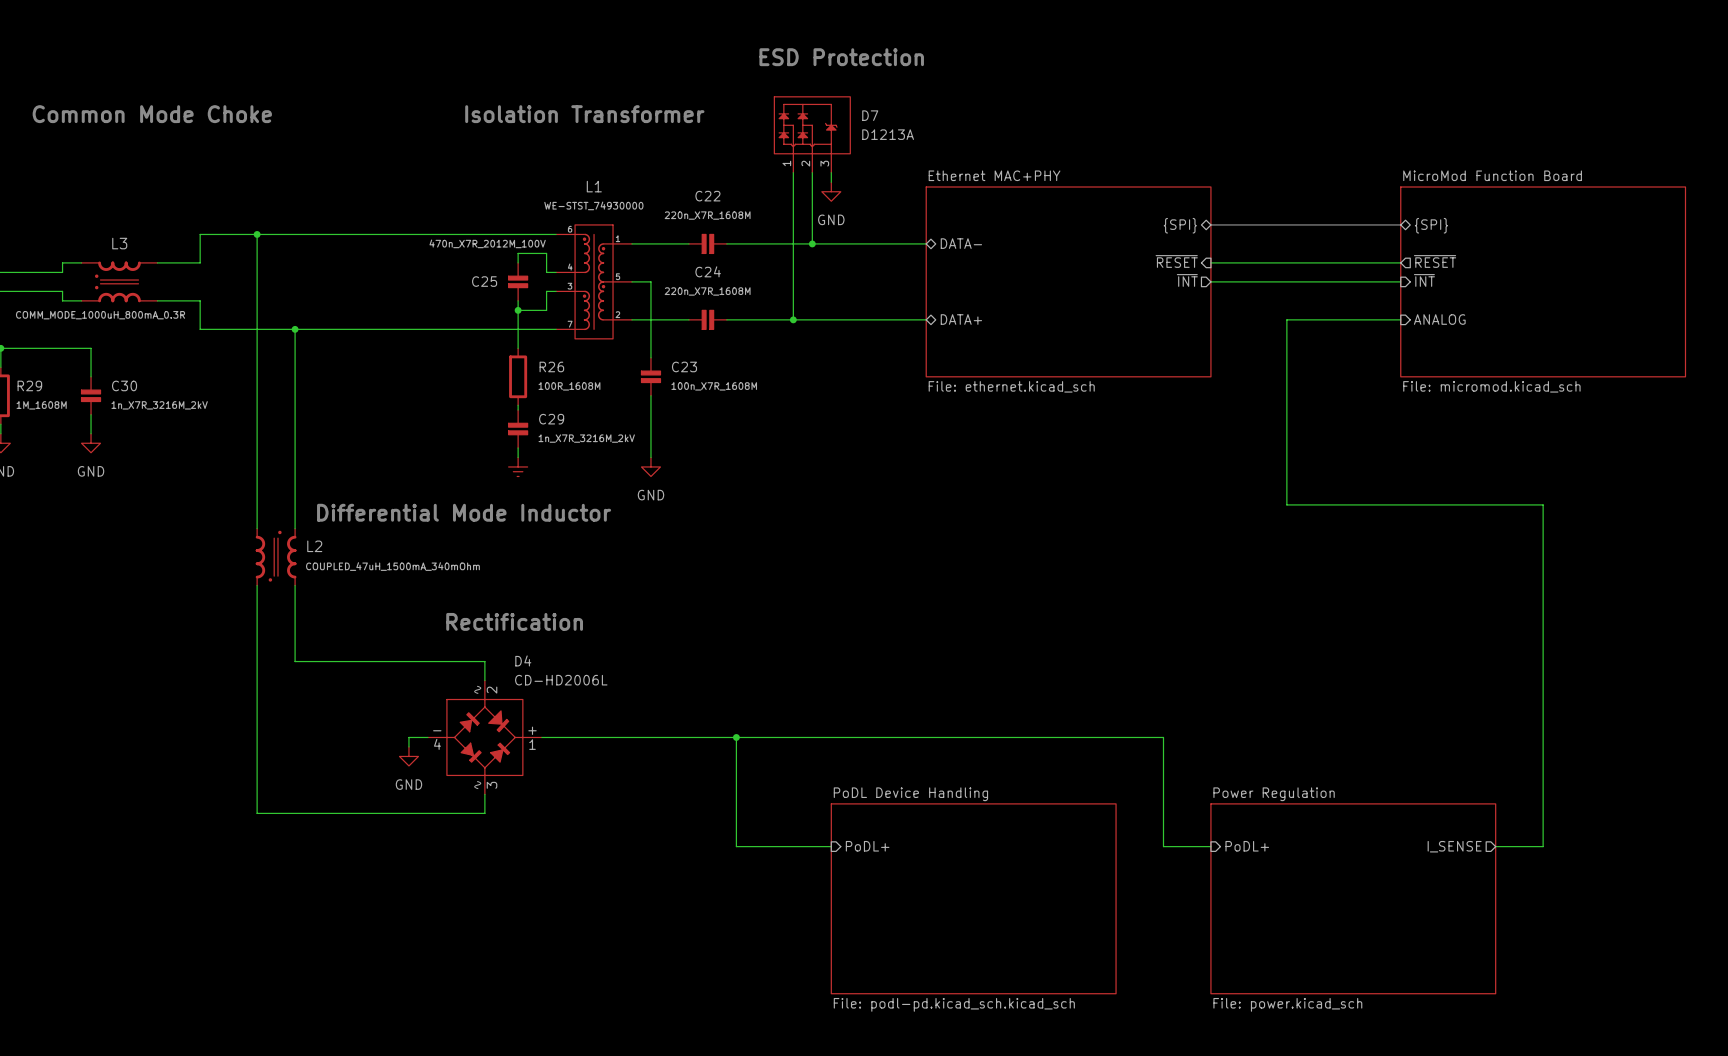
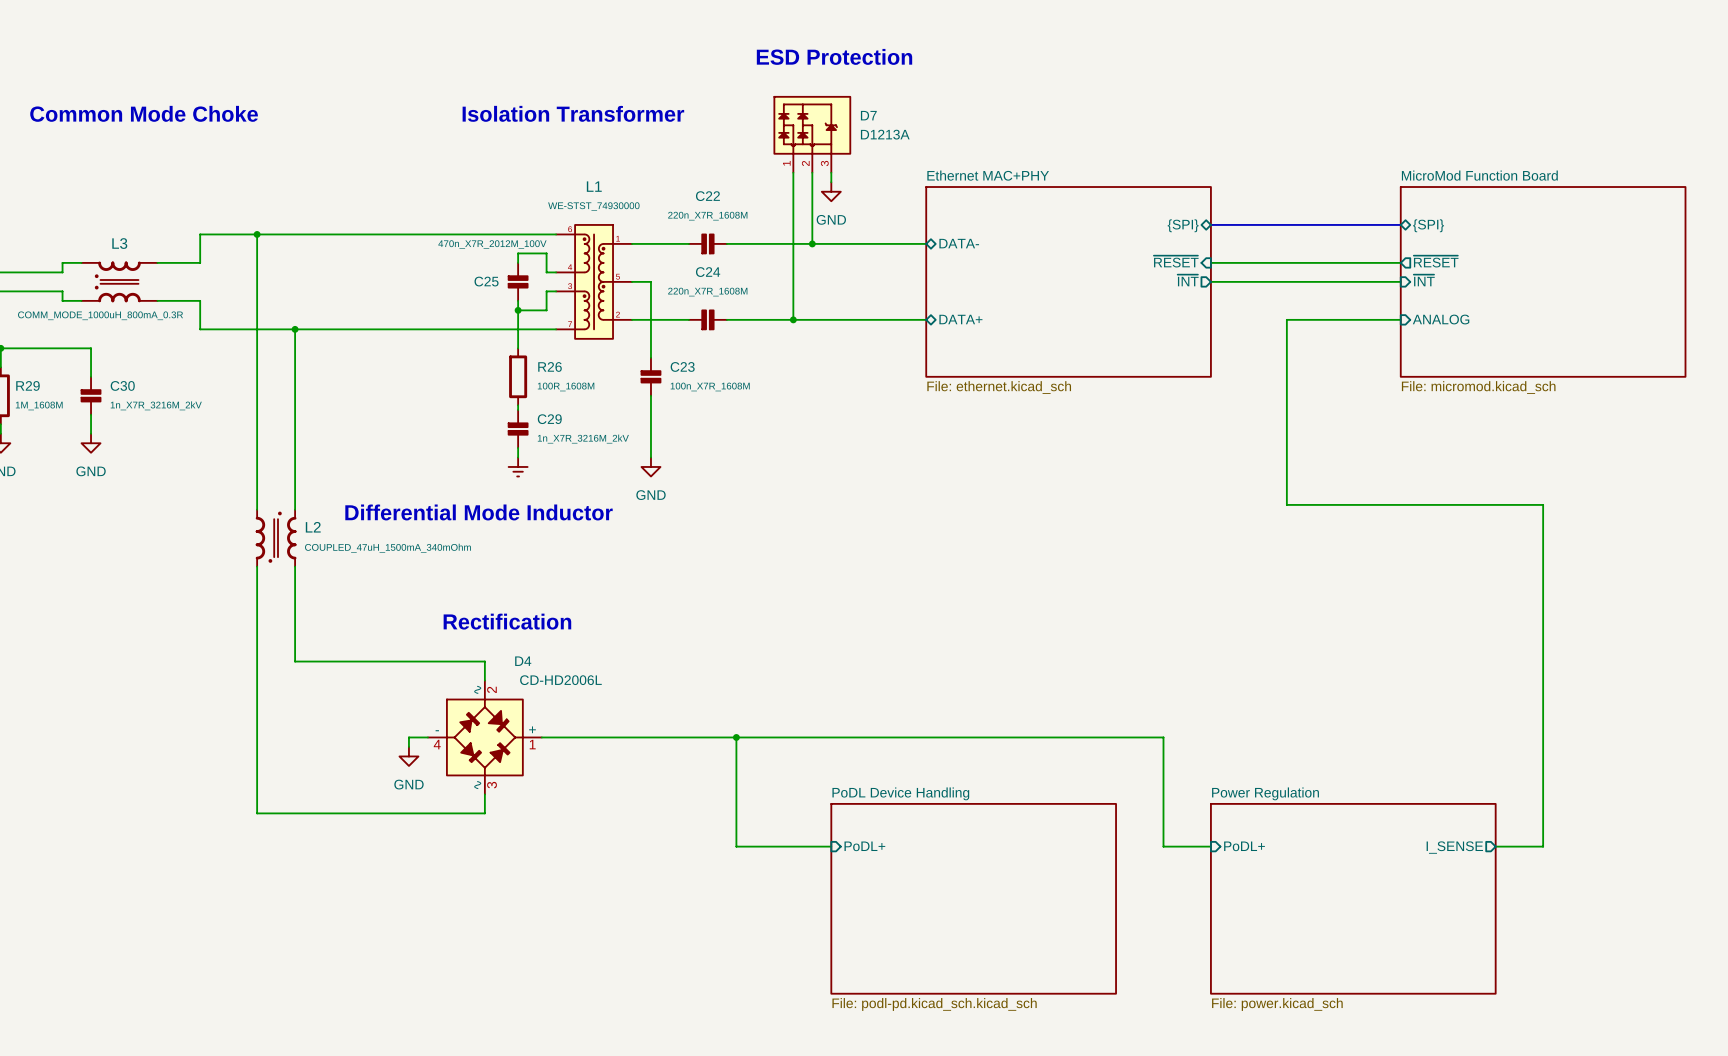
wire: (257, 509) (257, 528) -> (257, 566) (257, 585)
wire: (295, 509) (295, 528) -> (295, 566) (295, 585)
L2 position: (276, 557) -> (276, 538)

